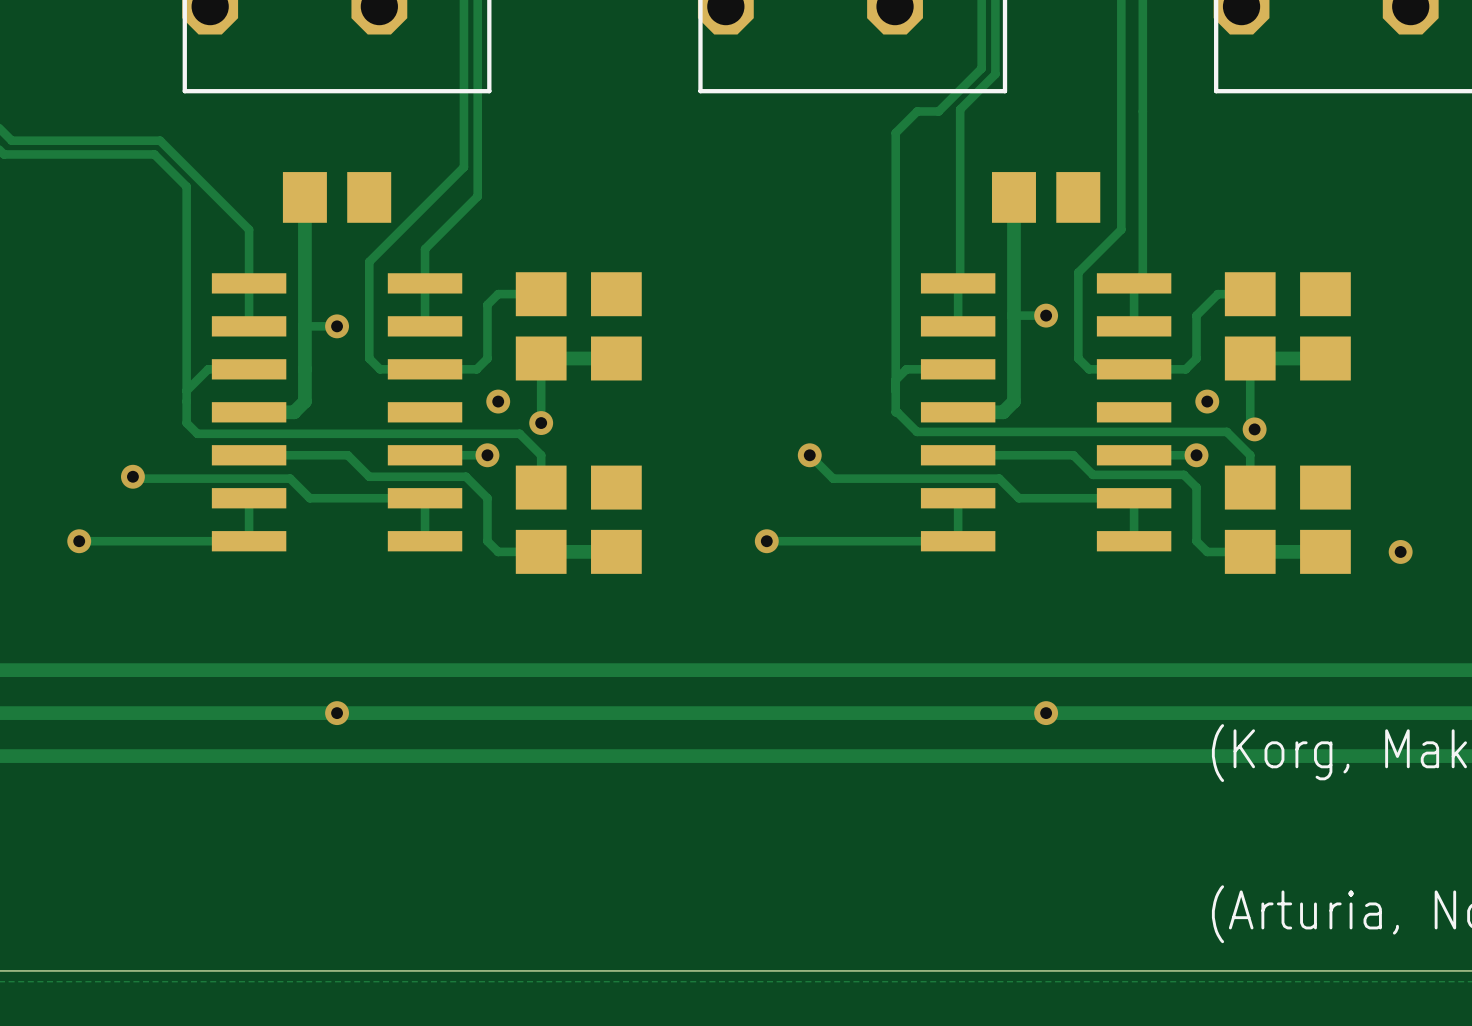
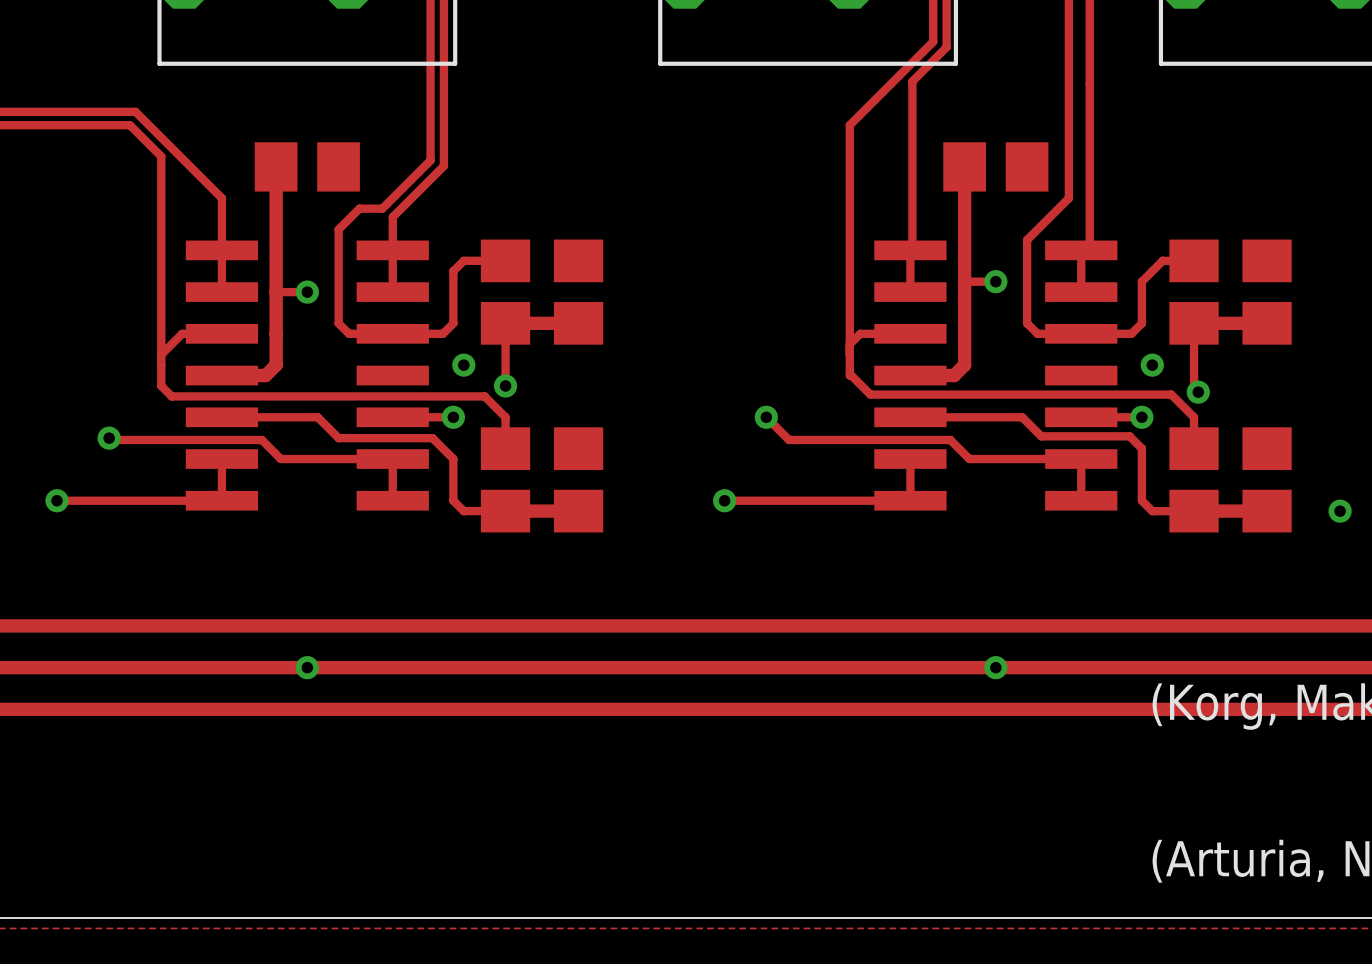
track: (938, 111) (917, 111) (895, 132) (895, 154) -> (891, 83) (849, 125)
track: (463, 167) (390, 240) -> (430, 137) (430, 160) (382, 208) (359, 208)

